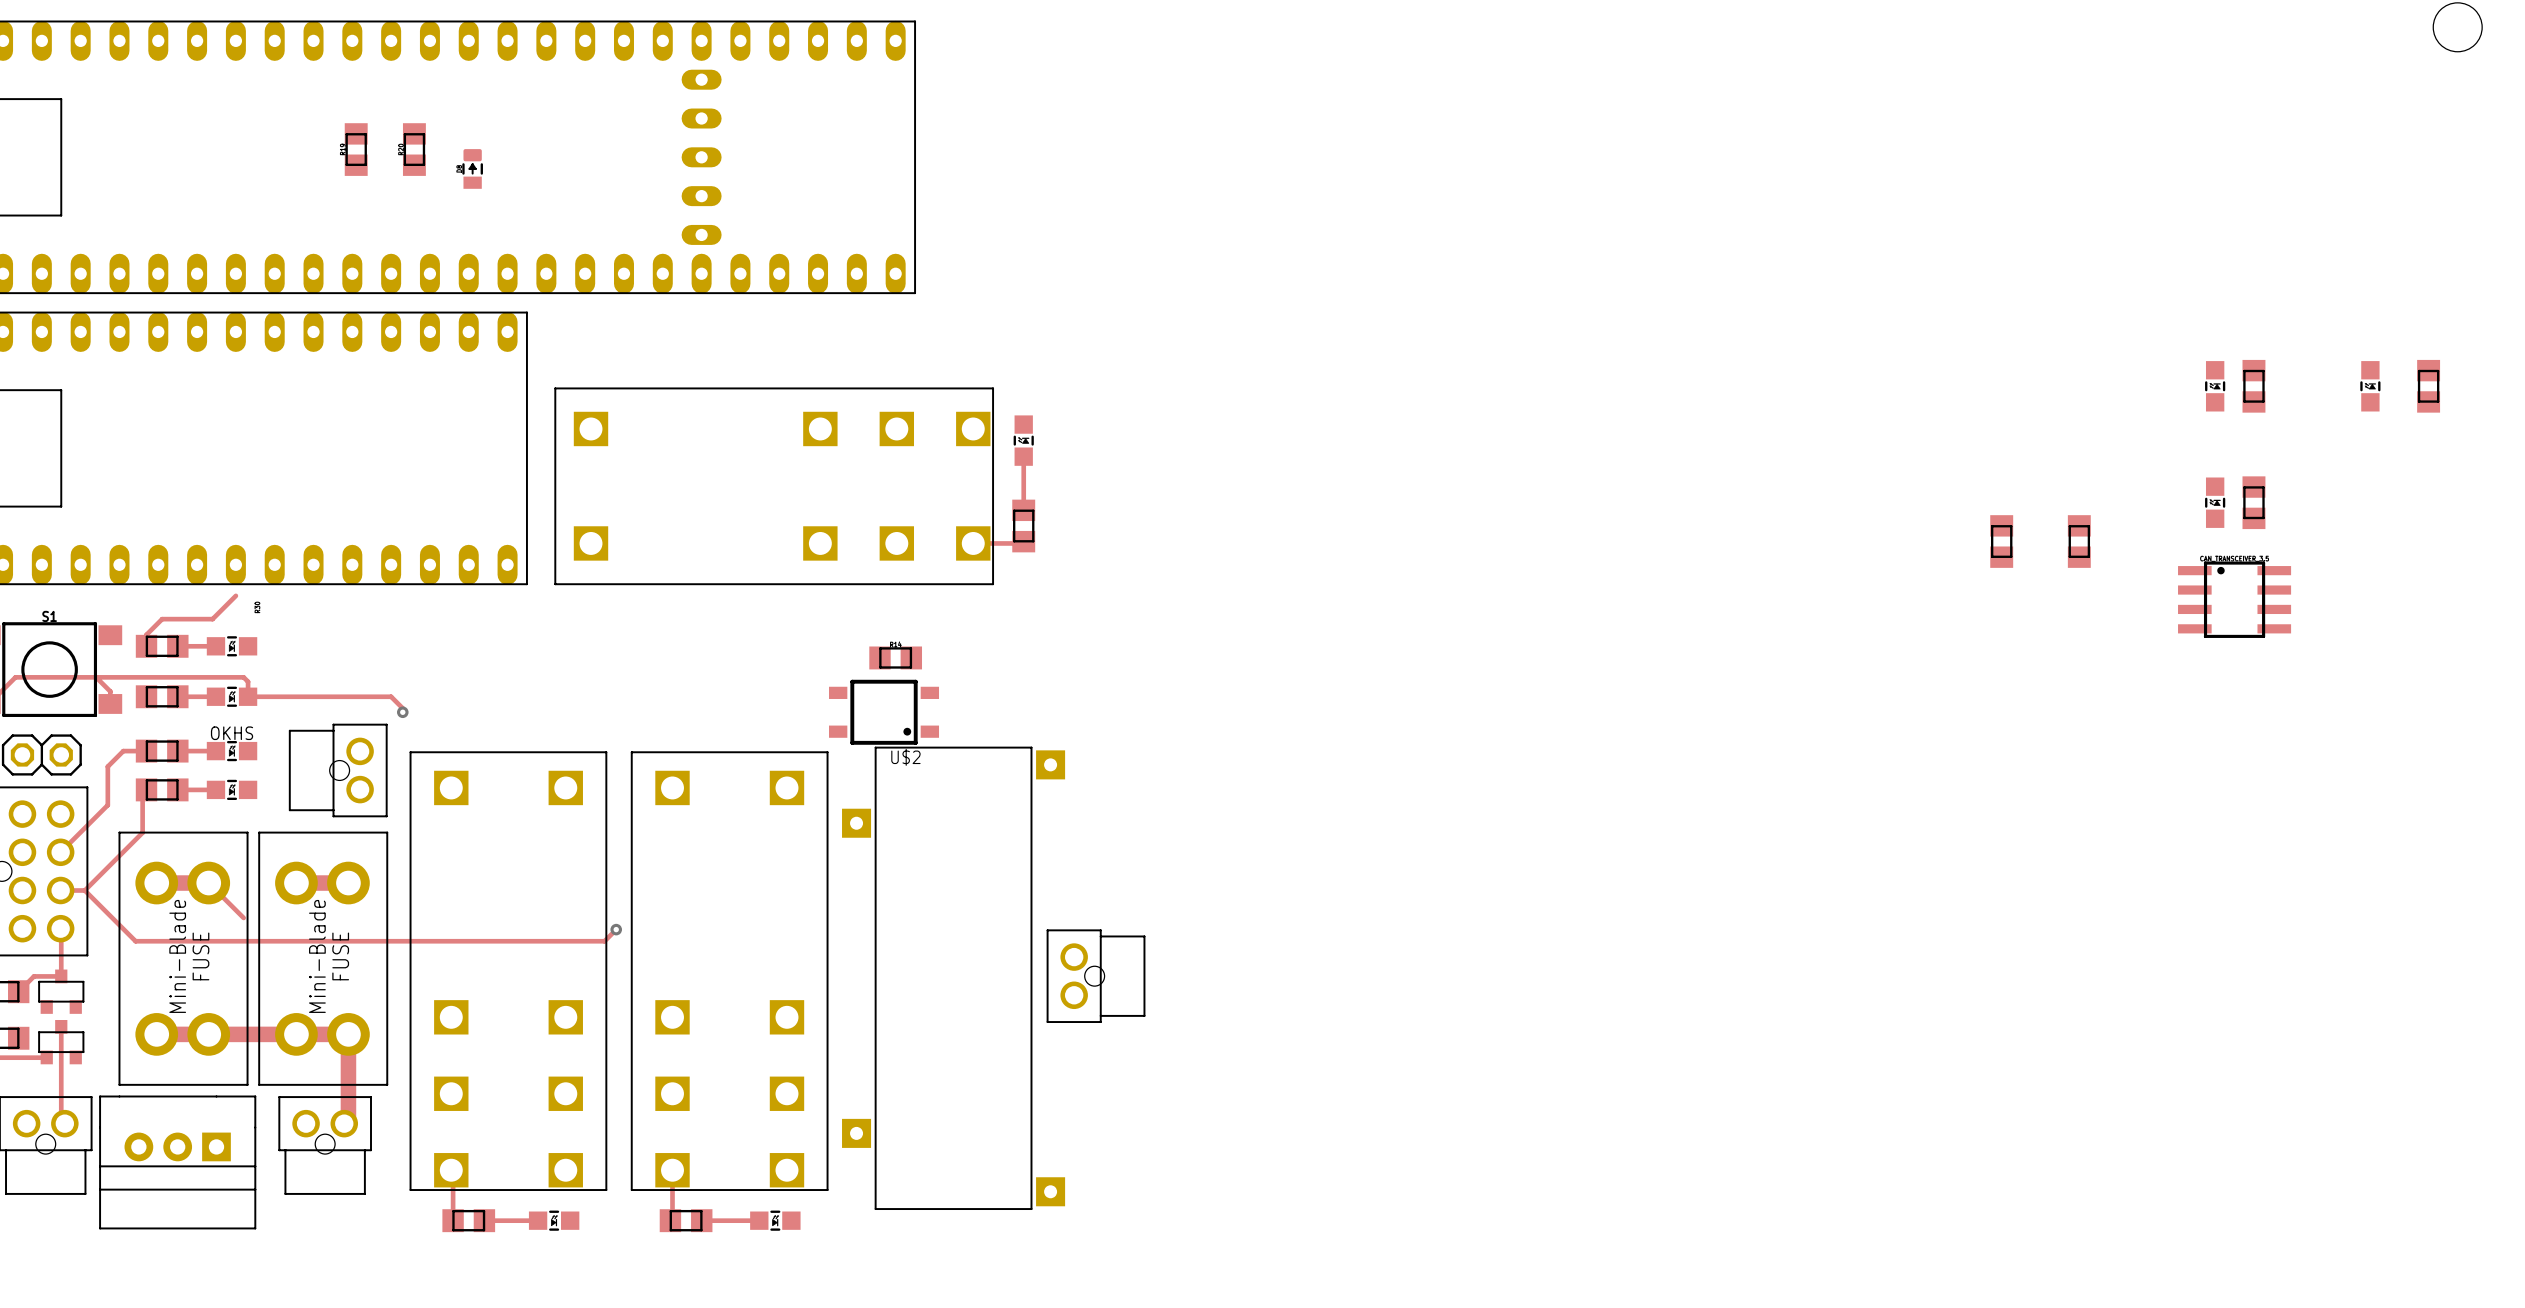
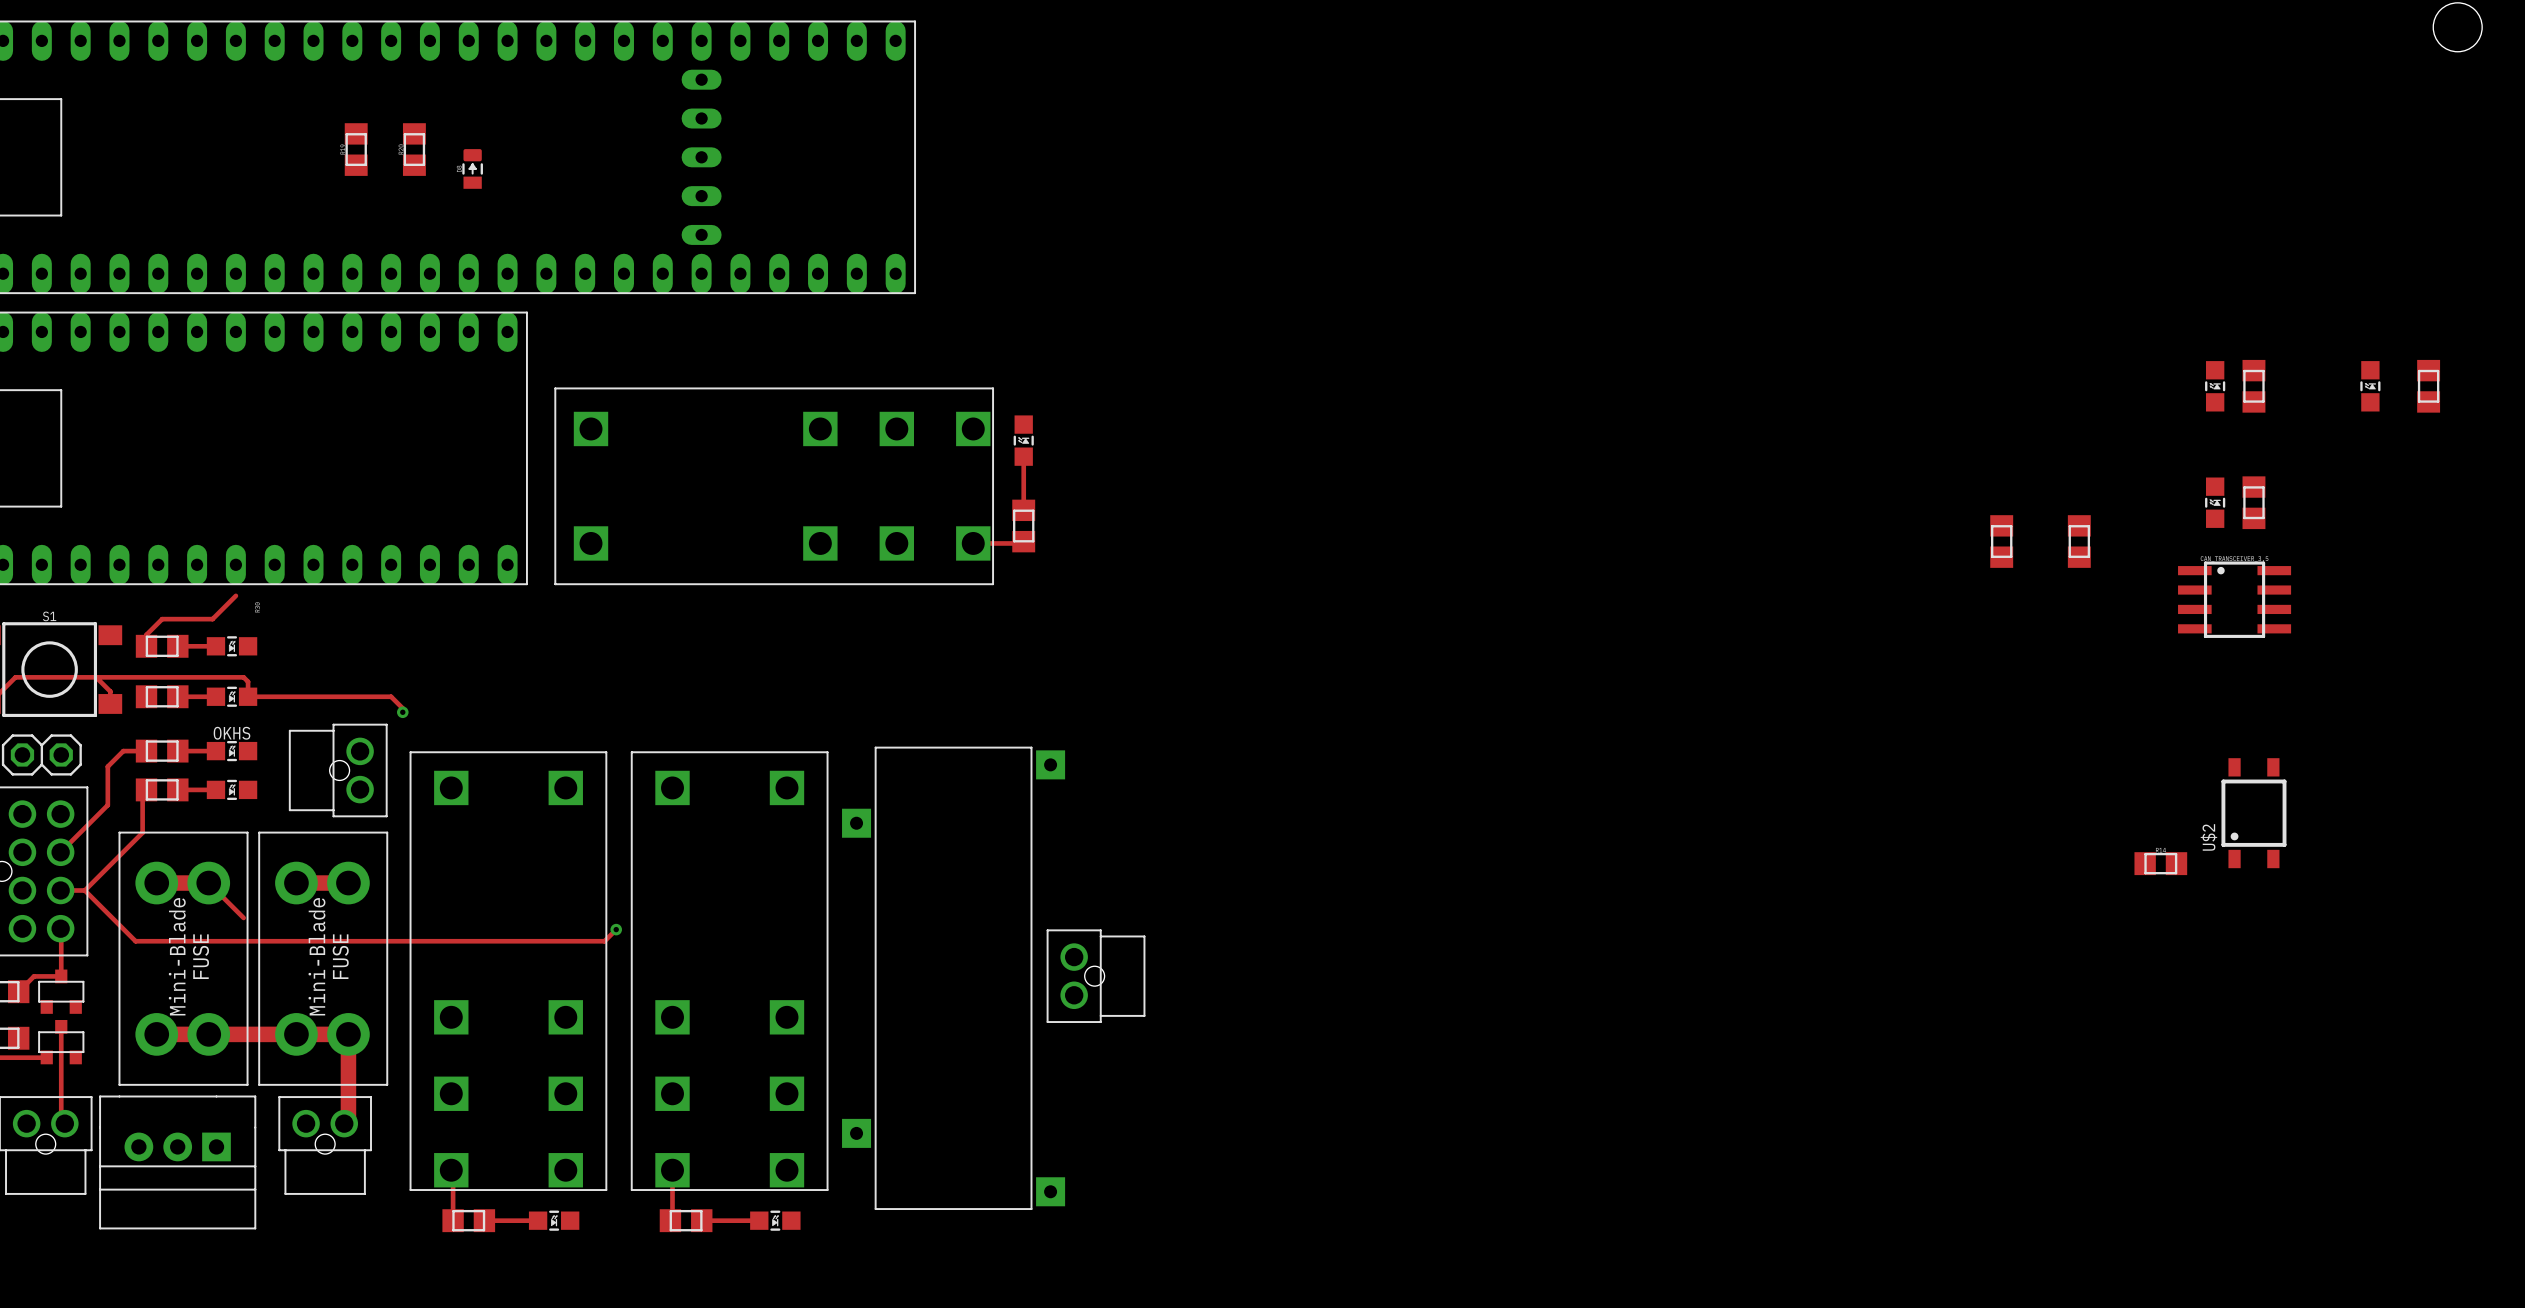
part position: (895, 657) -> (2160, 863)
U$2 rotation: 0° (884, 712) -> 90° clockwise (2253, 813)
U$2 position: (884, 712) -> (2253, 813)

